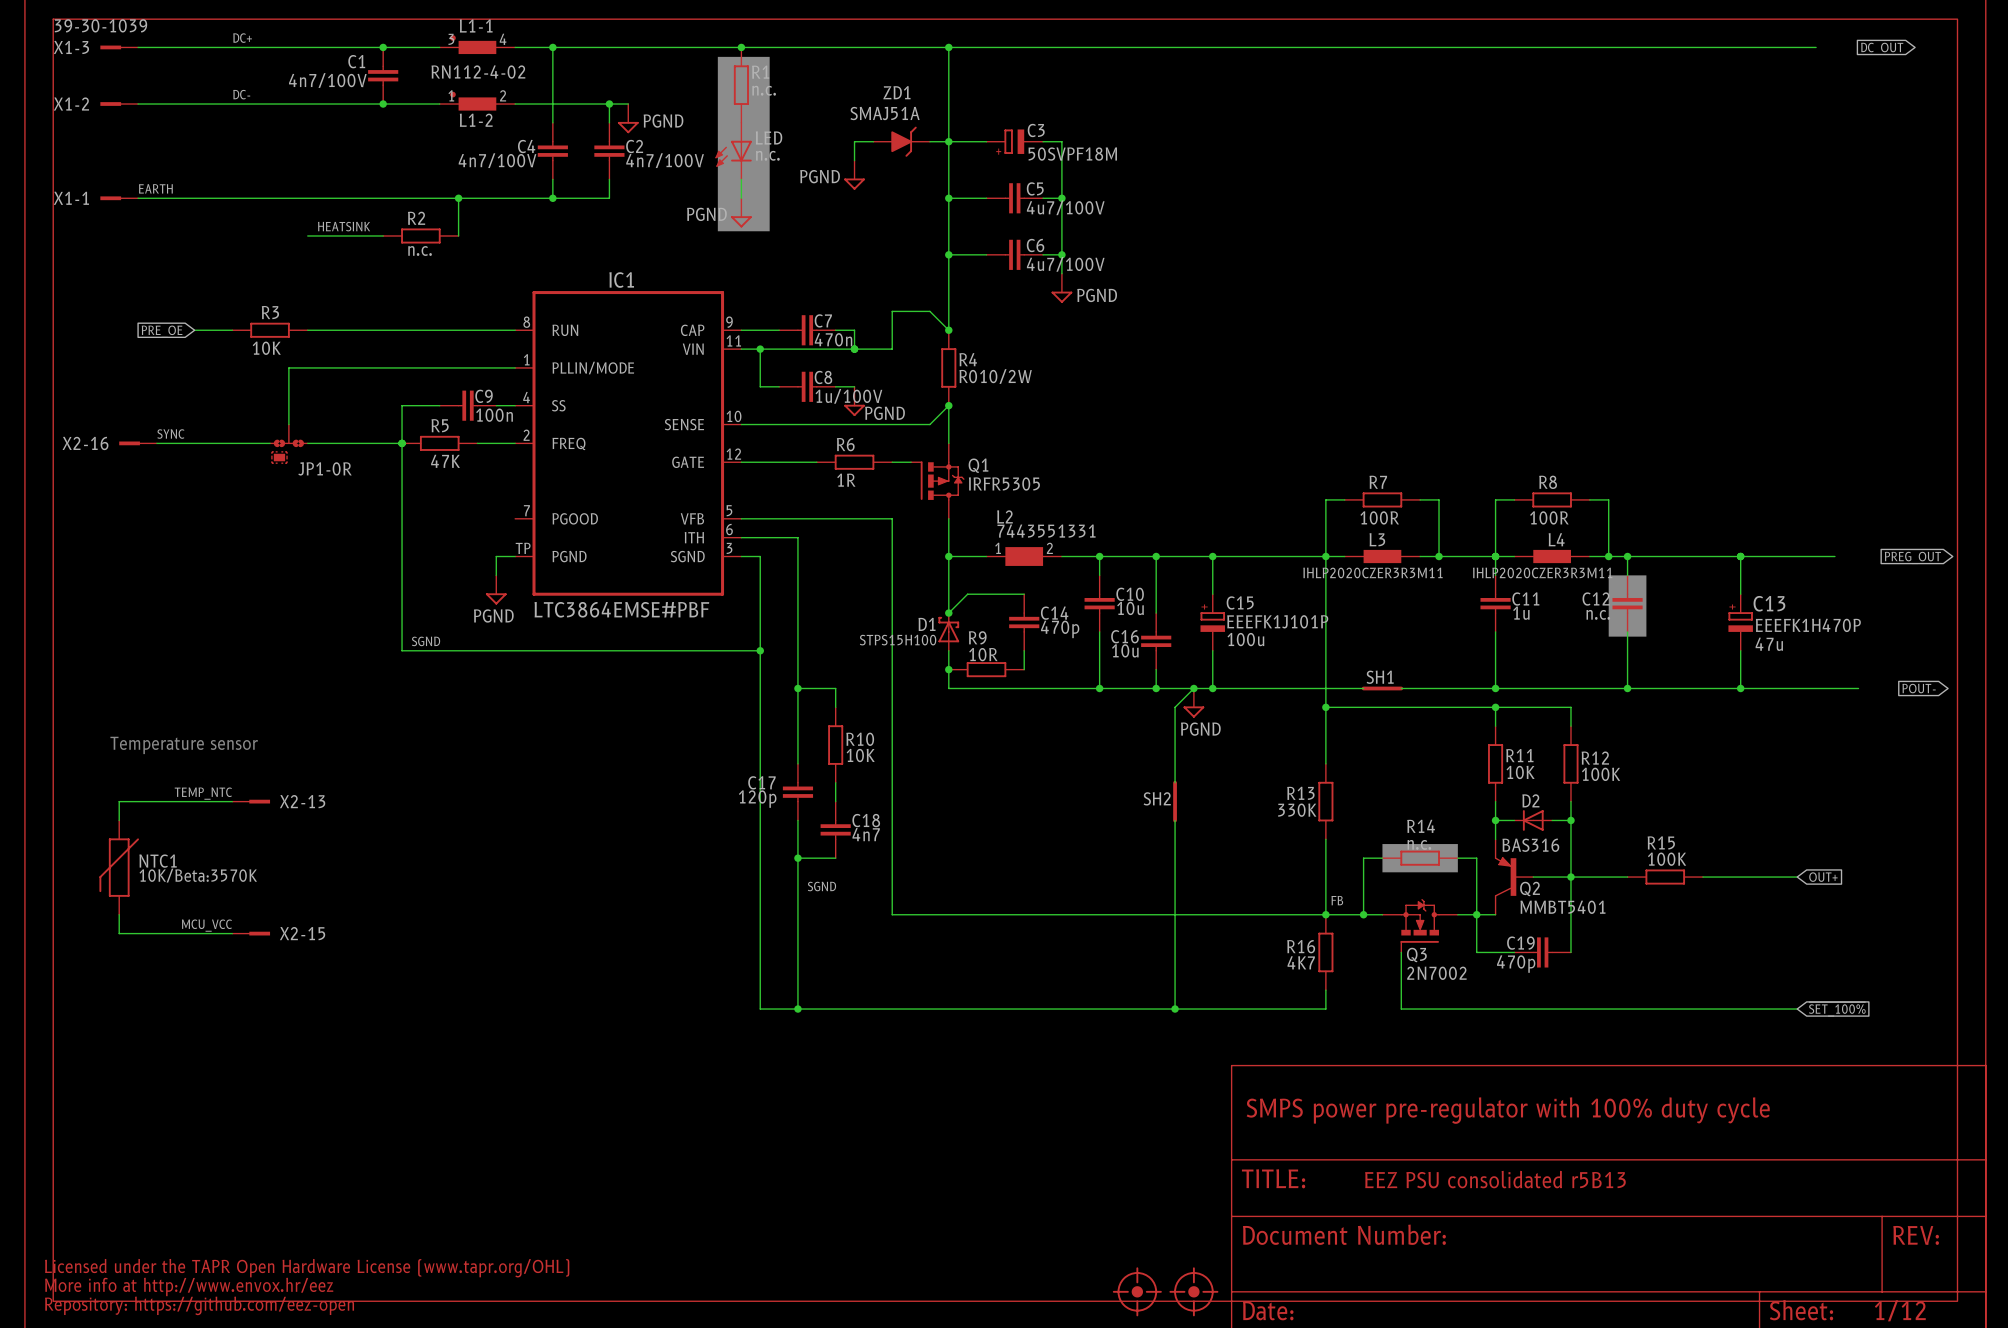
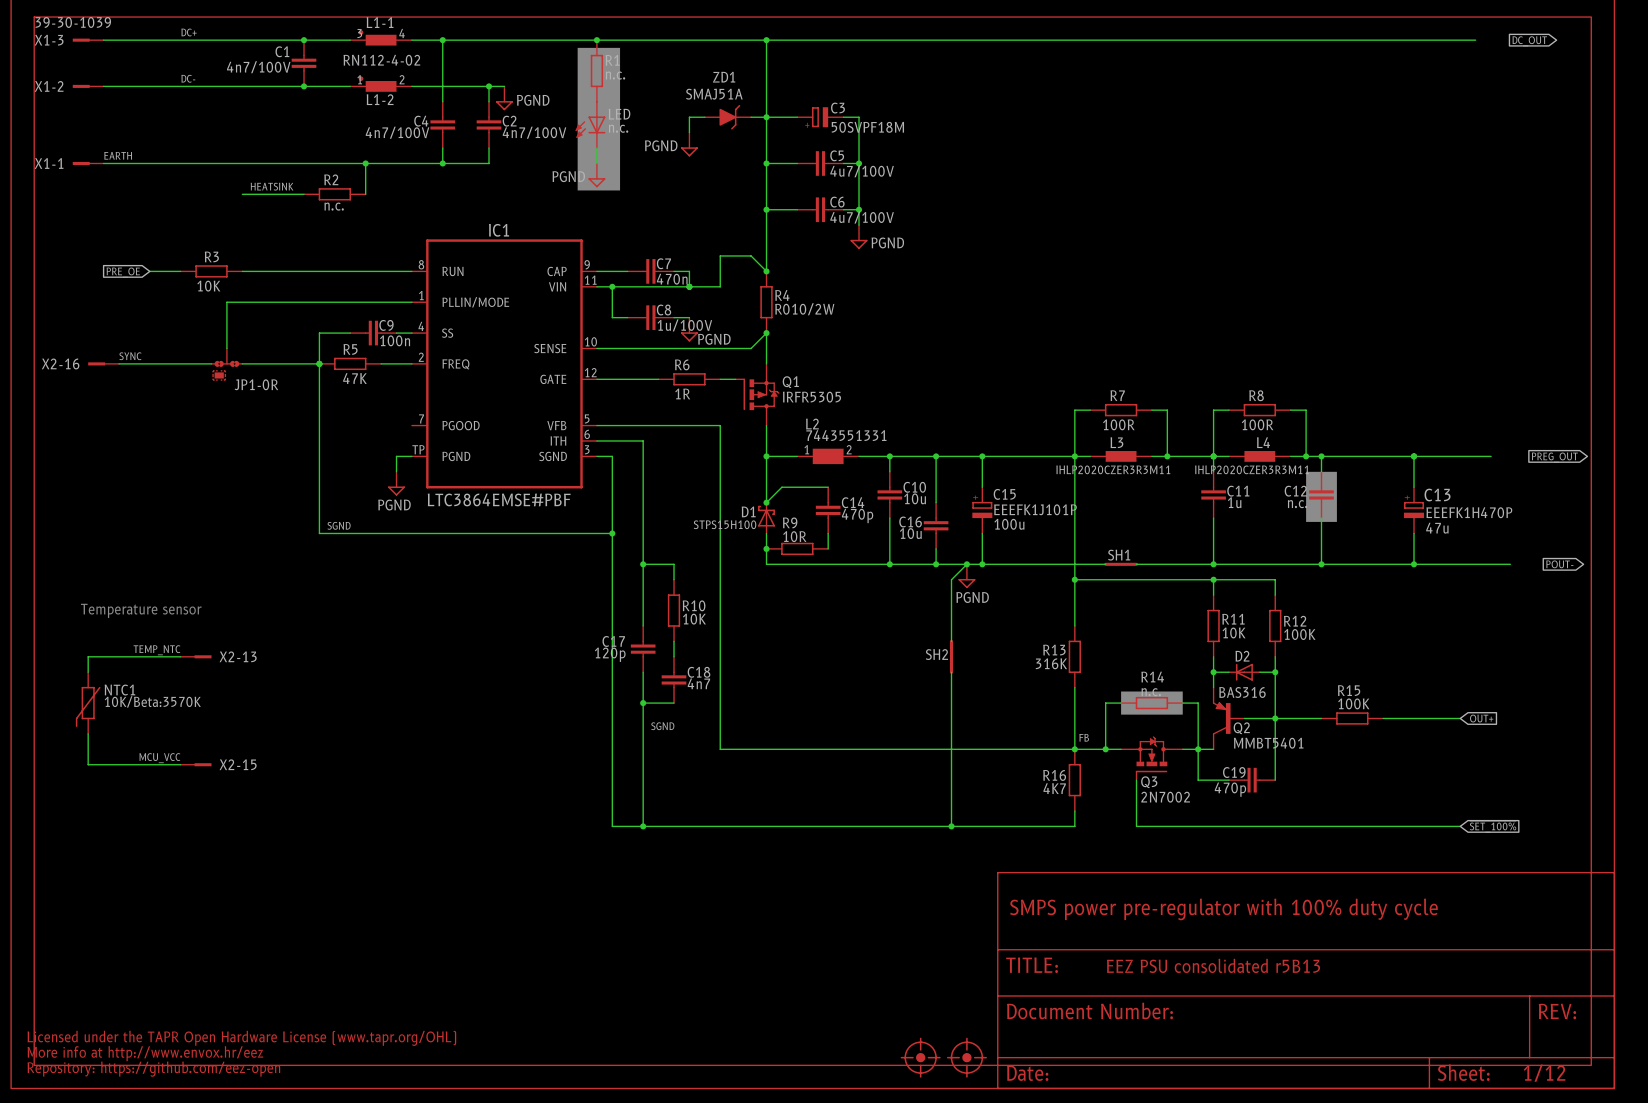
R13 value: 330K (1297, 810) -> 316K (1051, 663)
NTC1 symbol: [99, 820, 140, 915] -> [75, 672, 101, 734]

